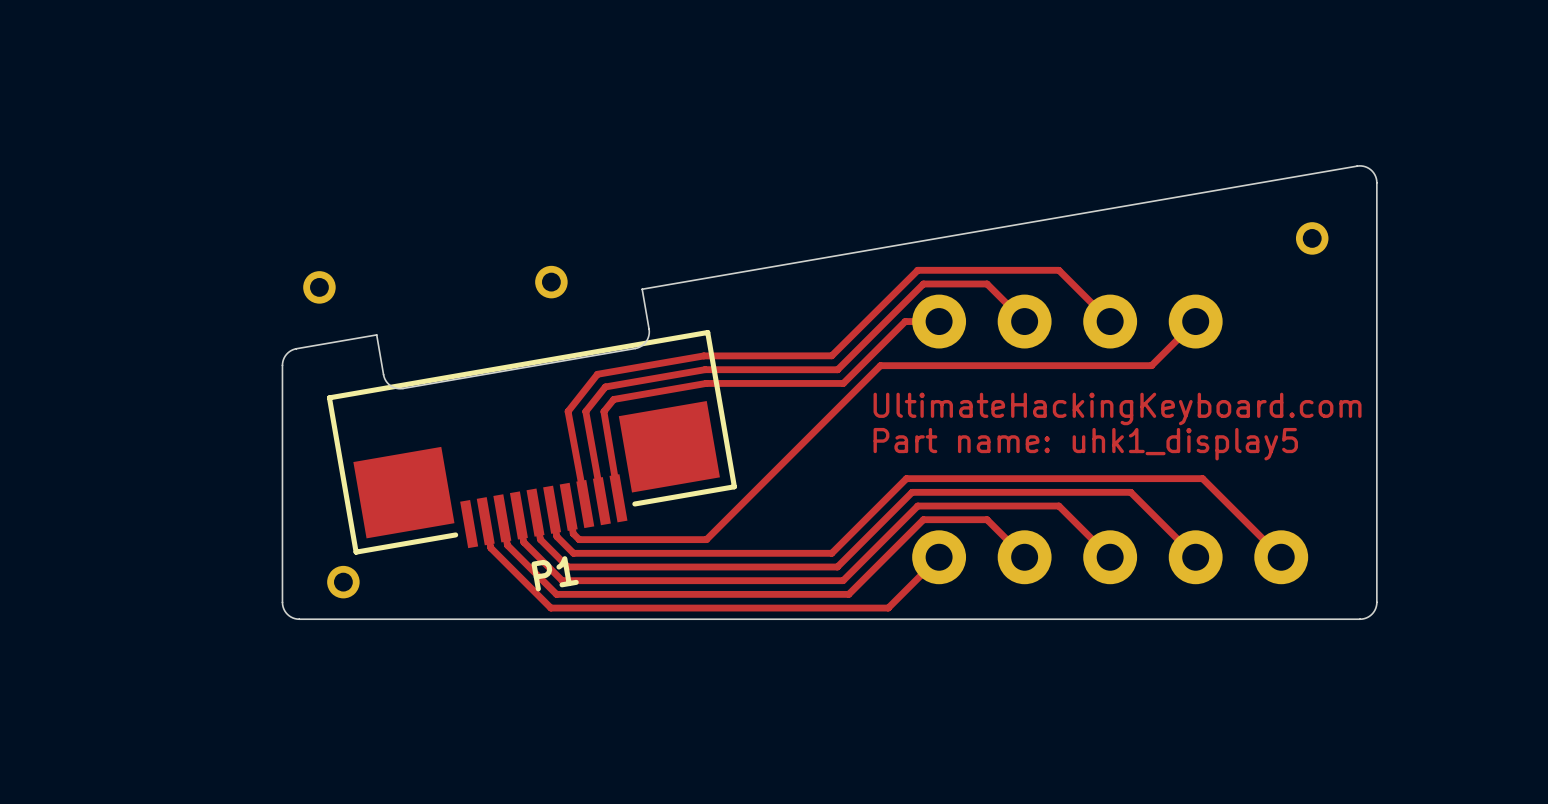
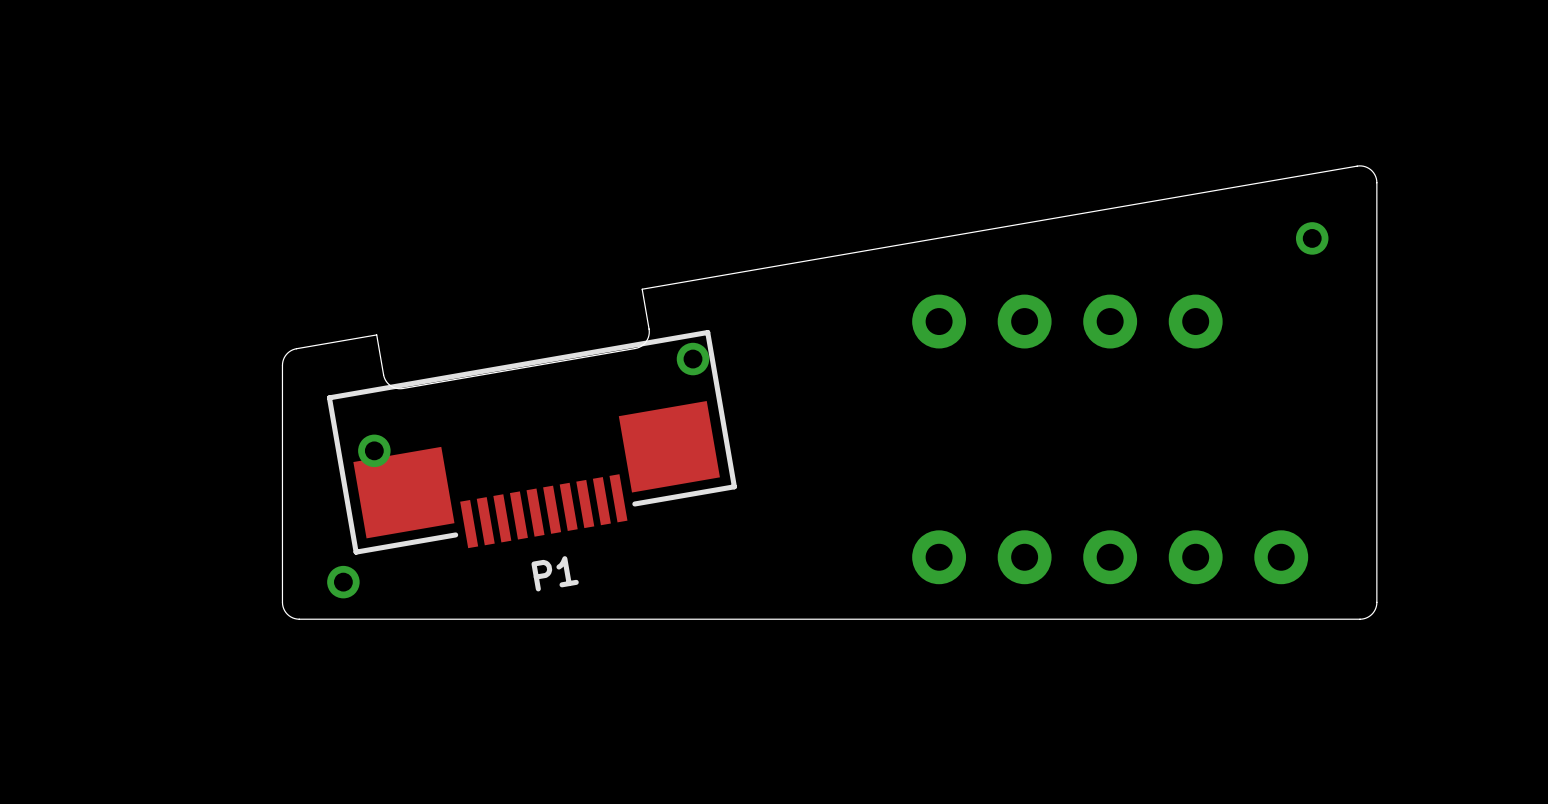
part: (551, 282) -> none
part: (319, 287) -> none
track: (939, 321) (905, 321) (843, 383) (706, 383) (613, 399) (603, 411) (618, 498) -> none
track: (1024, 321) (987, 283) (923, 283) (837, 369) (705, 369) (605, 386) (585, 411) (601, 501) -> none
track: (1110, 321) (1058, 270) (917, 270) (831, 355) (703, 355) (597, 374) (568, 411) (585, 504) -> none
track: (1195, 321) (1151, 365) (880, 365) (706, 539) (579, 539) (573, 533) (568, 506) -> none
part: none -> (693, 359)
text: UltimateHackingKeyboard.com (1117, 408) -> none
text: Part name: uhk1_display5 (1085, 444) -> none
part: none -> (374, 450)
track: (552, 509) (556, 536) (573, 553) (831, 553) (906, 478) (1202, 478) (1281, 557) -> none
track: (535, 512) (540, 539) (567, 567) (837, 567) (912, 492) (1130, 492) (1195, 557) -> none
track: (518, 515) (523, 542) (562, 580) (843, 580) (917, 506) (1058, 506) (1110, 557) -> none
track: (502, 518) (507, 545) (556, 594) (848, 594) (923, 519) (987, 519) (1024, 557) -> none
track: (485, 521) (490, 548) (550, 608) (888, 608) (939, 557) -> none

